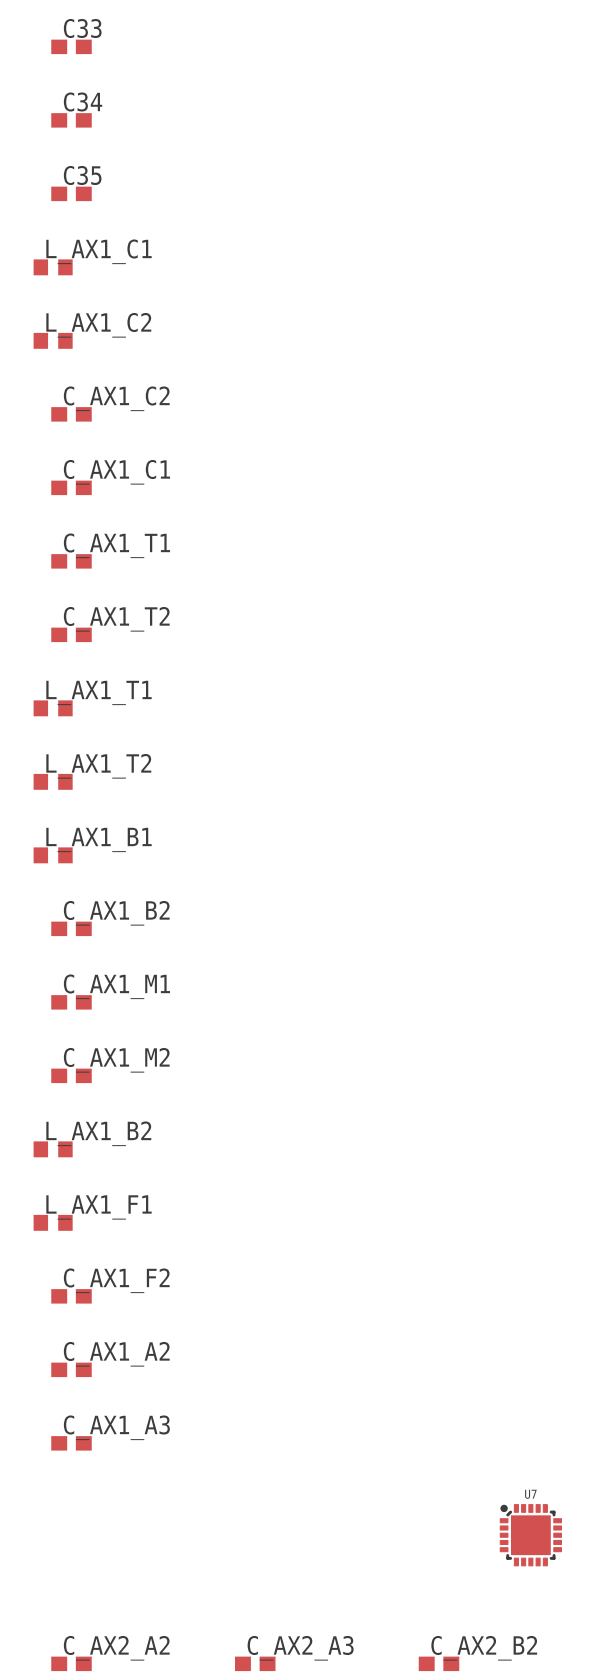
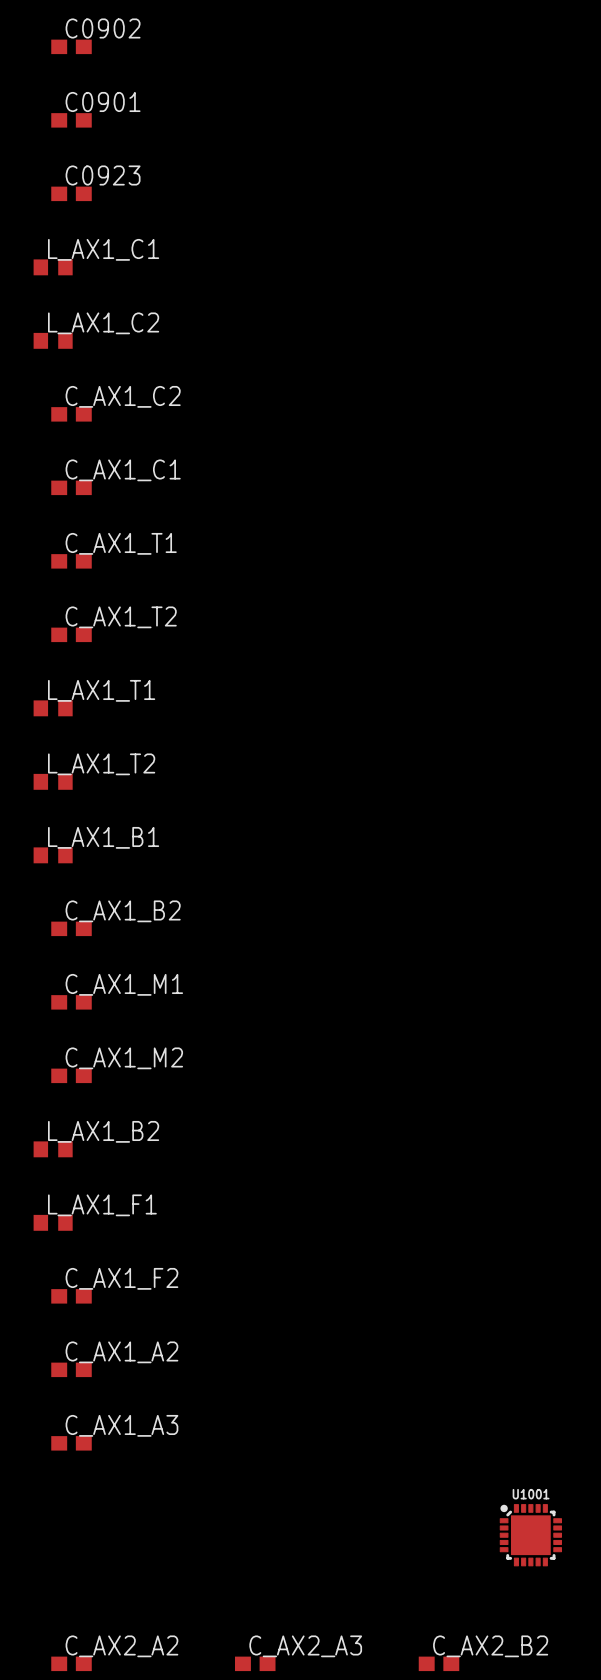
C33 name: C33 (82, 28) -> C0902 (103, 28)
C34 name: C34 (83, 102) -> C0901 (103, 101)
C35 name: C35 (82, 175) -> C0923 (103, 175)
U7 name: U7 (530, 1494) -> U1001 (531, 1494)

